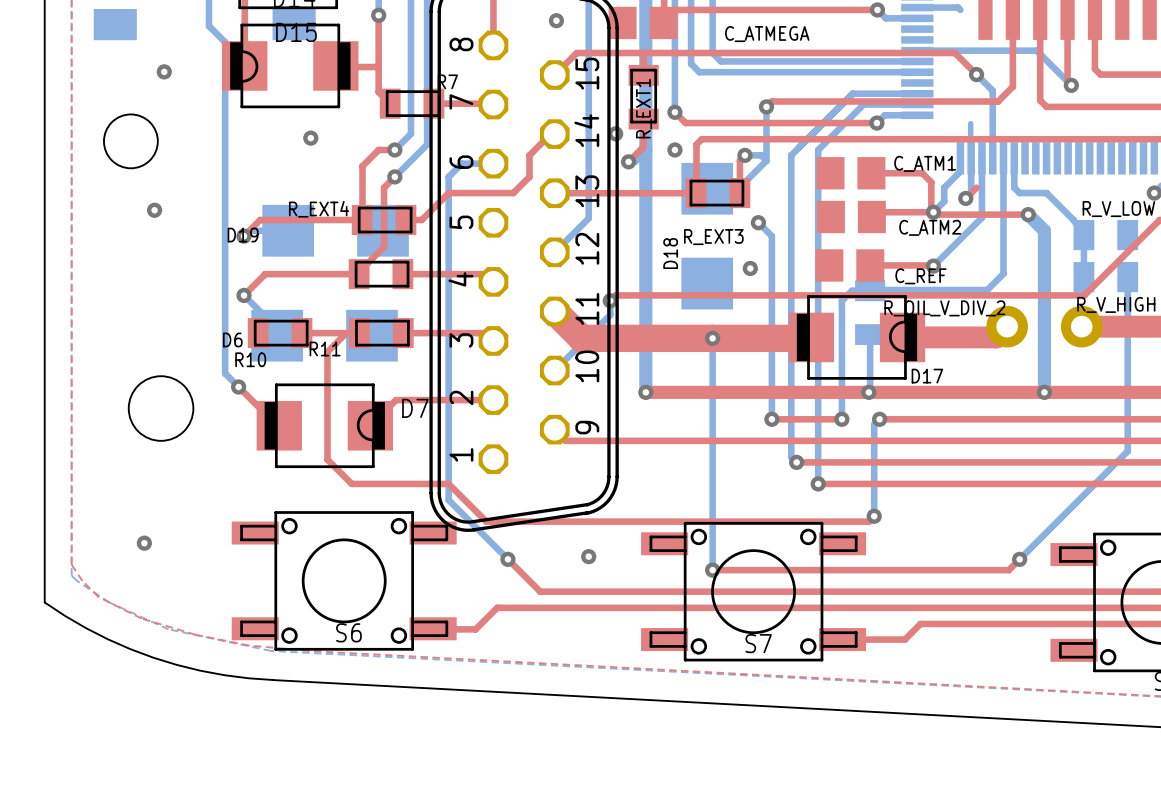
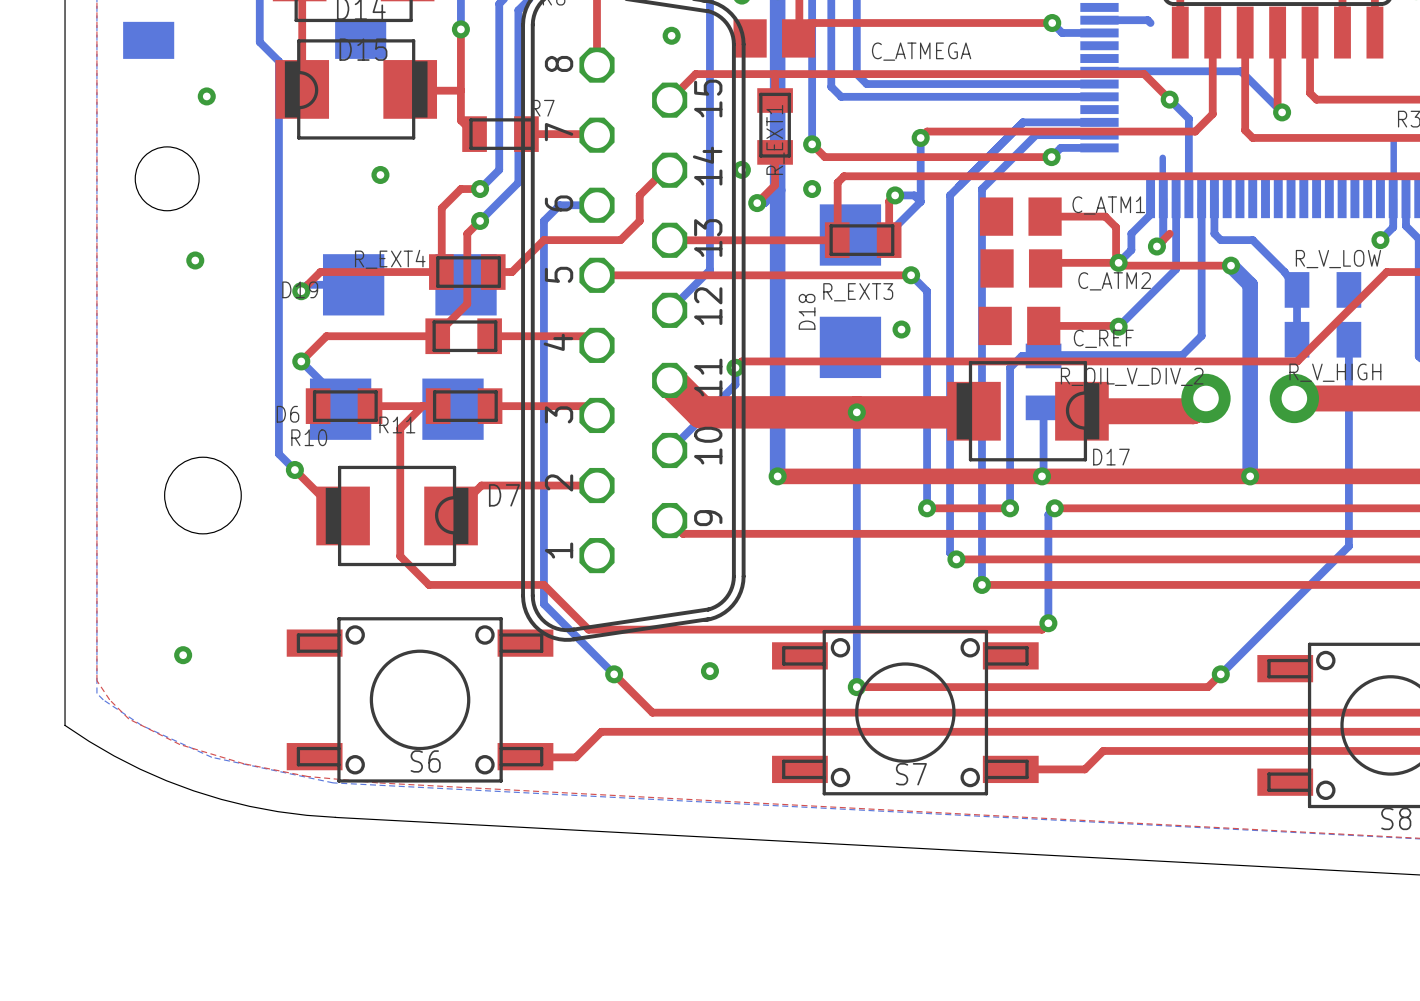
top track: none -> (913, 274) (597, 275)

